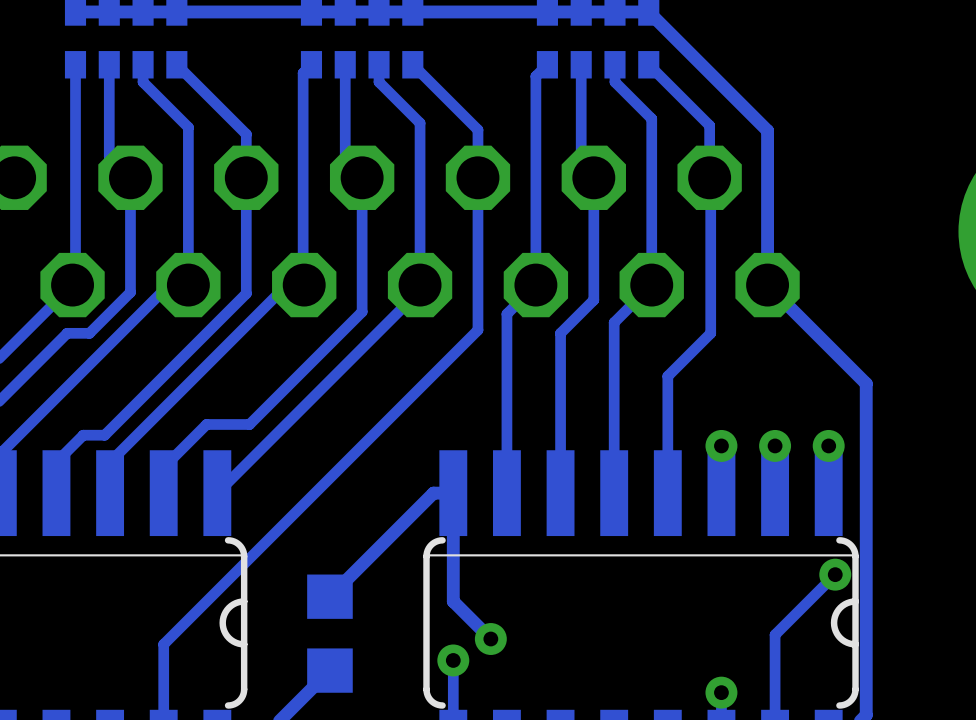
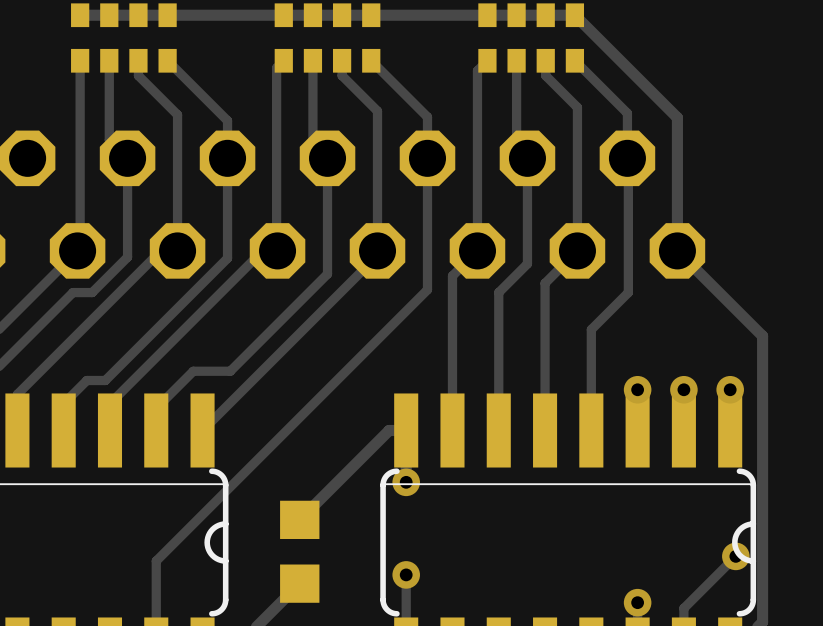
track: (453, 553) (453, 601) (490, 639) -> none
track: (835, 574) (775, 634) (775, 699) -> (735, 556) (683, 608)
via position: (835, 574) -> (735, 556)
via position: (490, 639) -> (406, 482)

